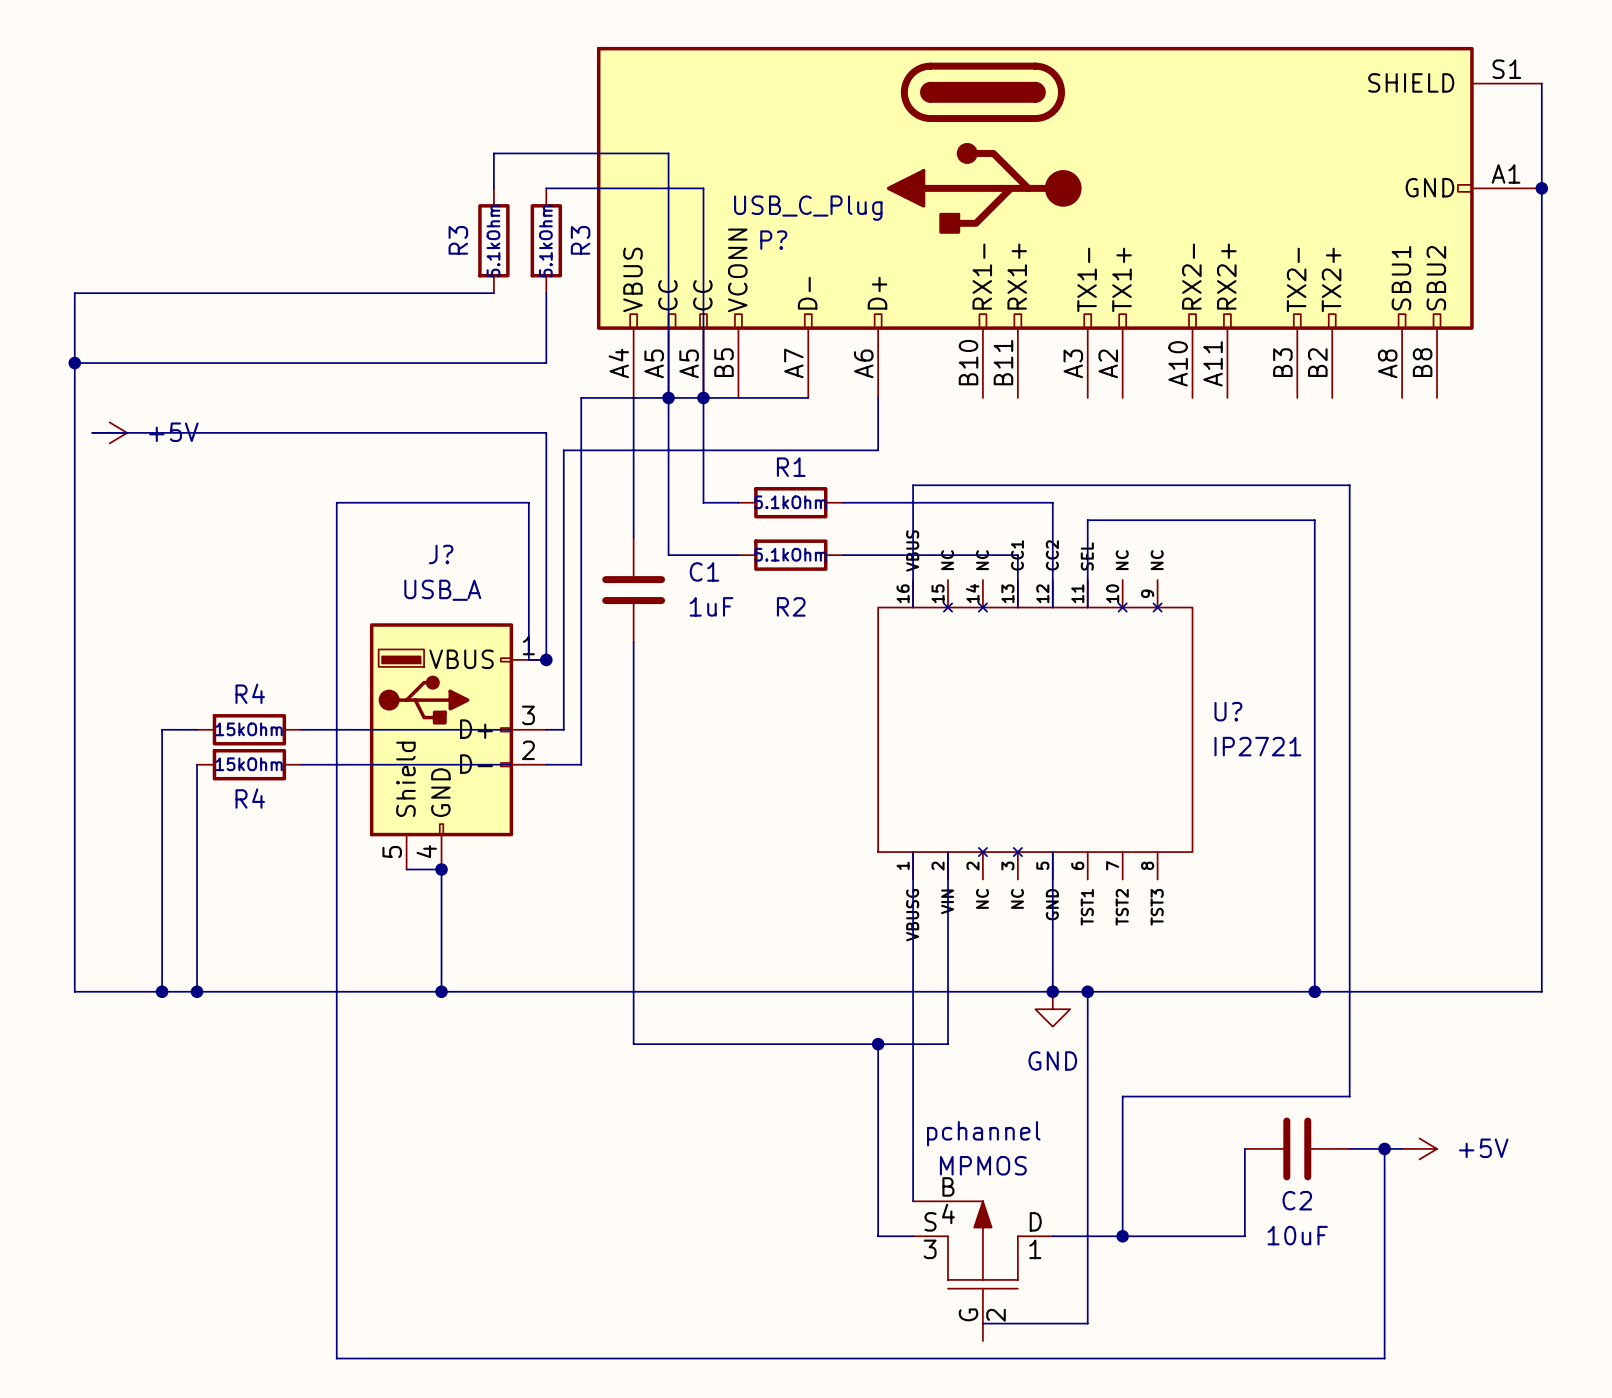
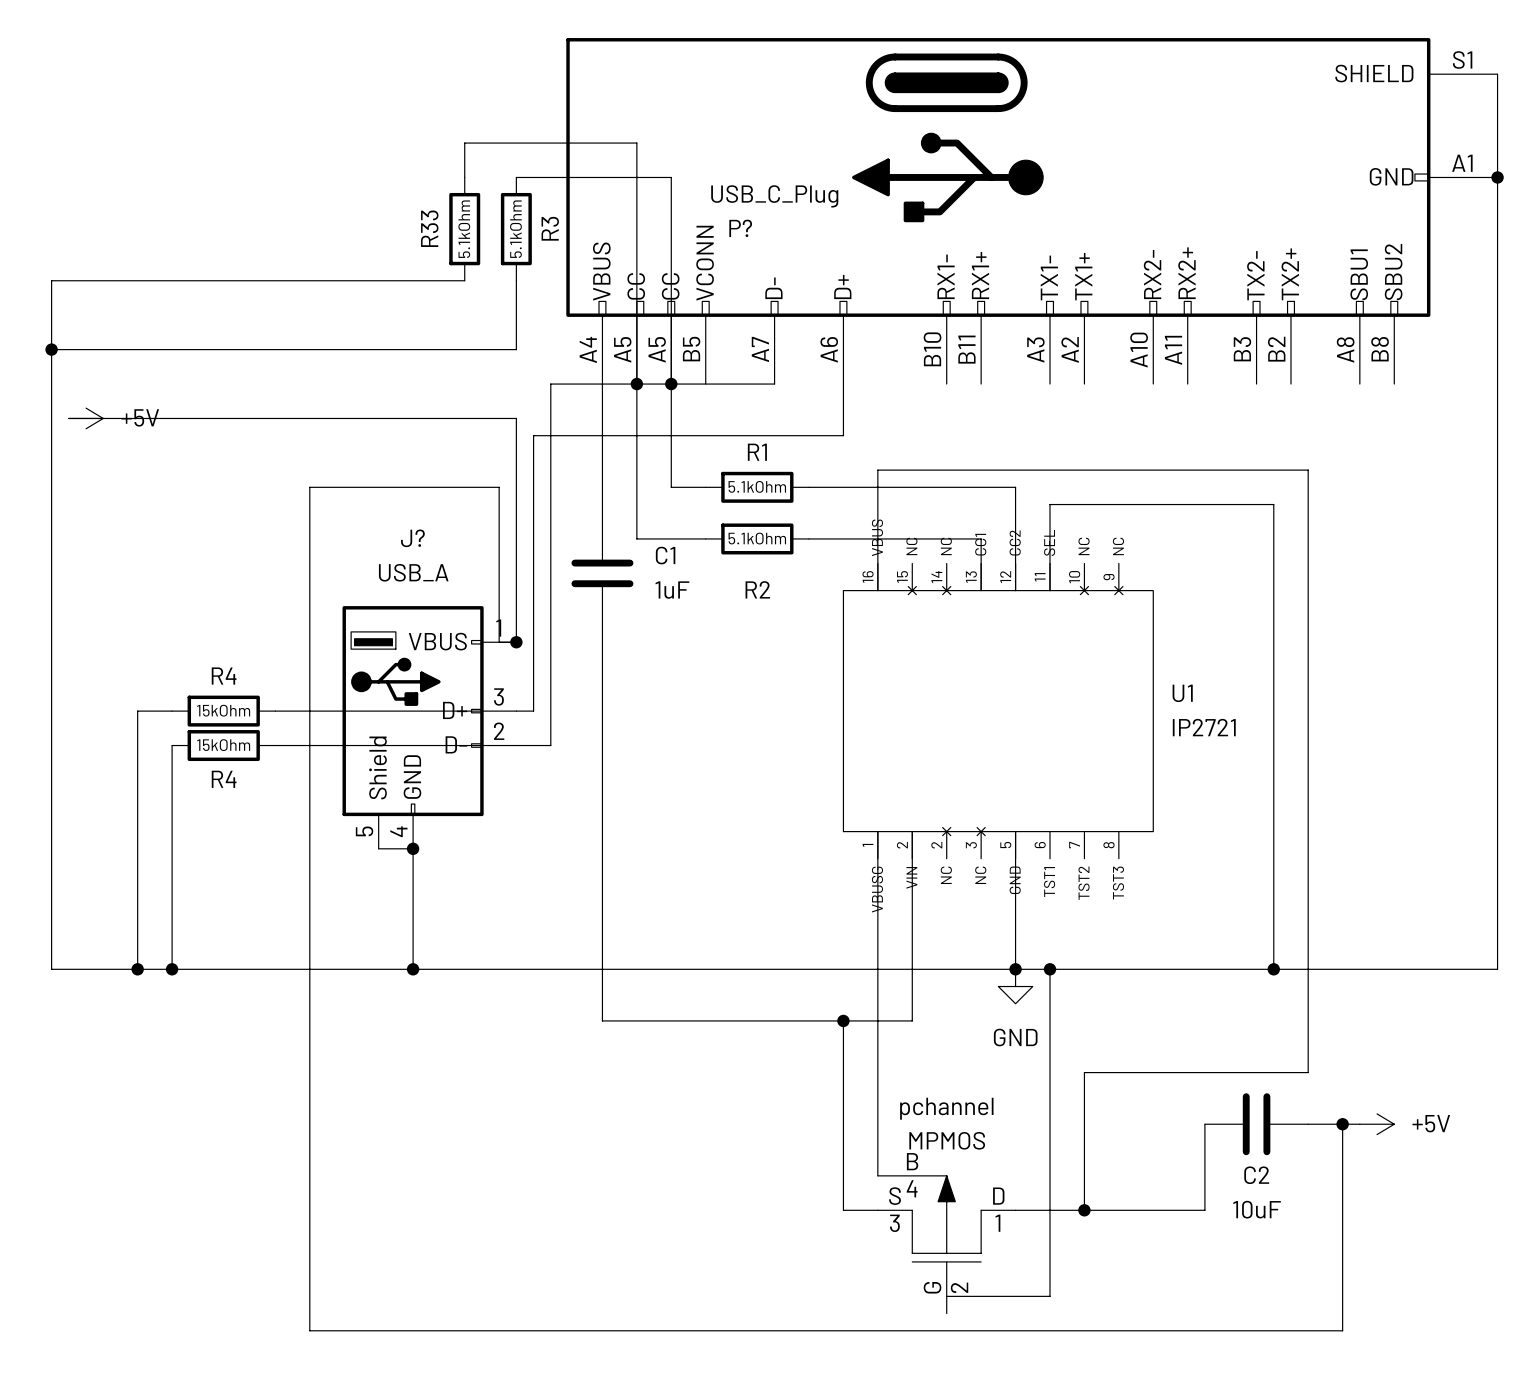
R3 name: R3 (458, 240) -> R33 (429, 228)
U? name: U? (1228, 711) -> U1 (1182, 693)

